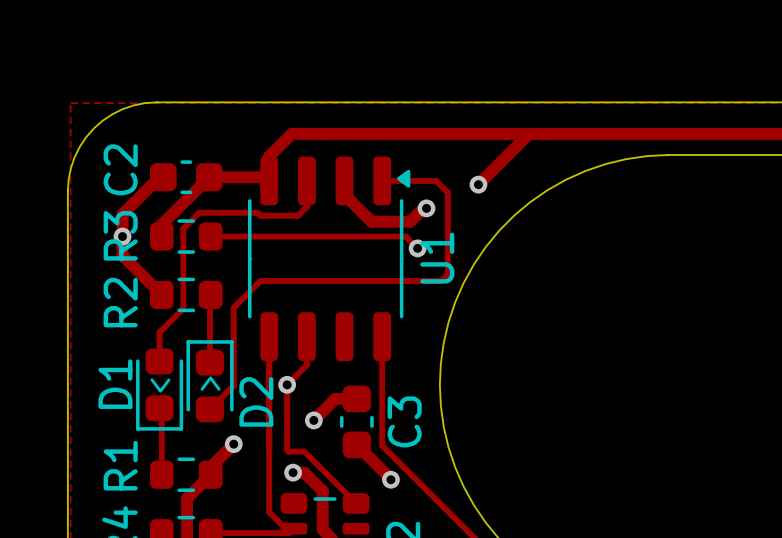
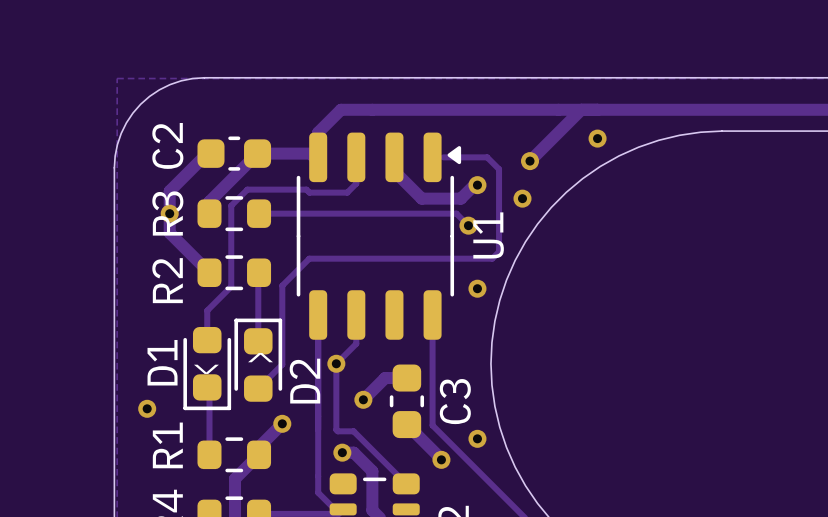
via: none -> (597, 138)
via: none -> (522, 198)
via: none -> (477, 288)
via: none -> (147, 408)
via: none -> (477, 438)

